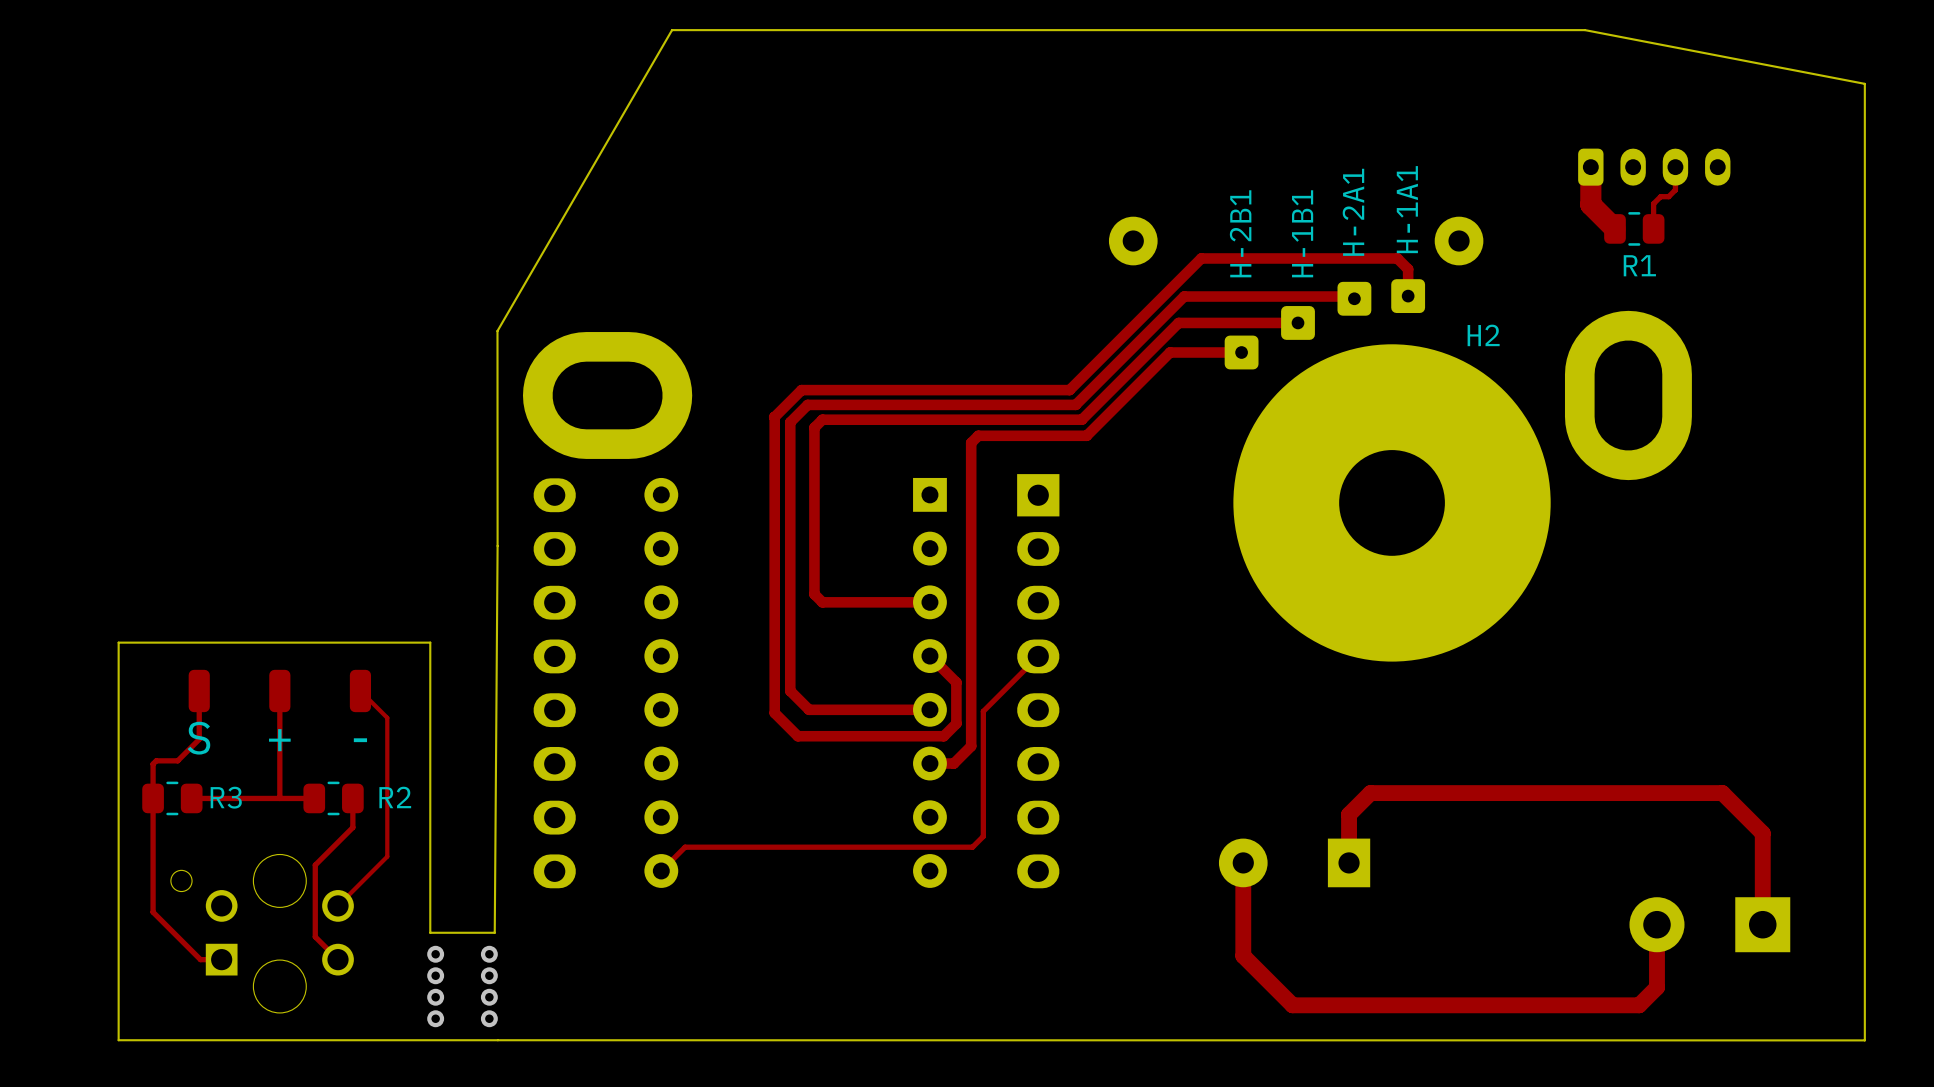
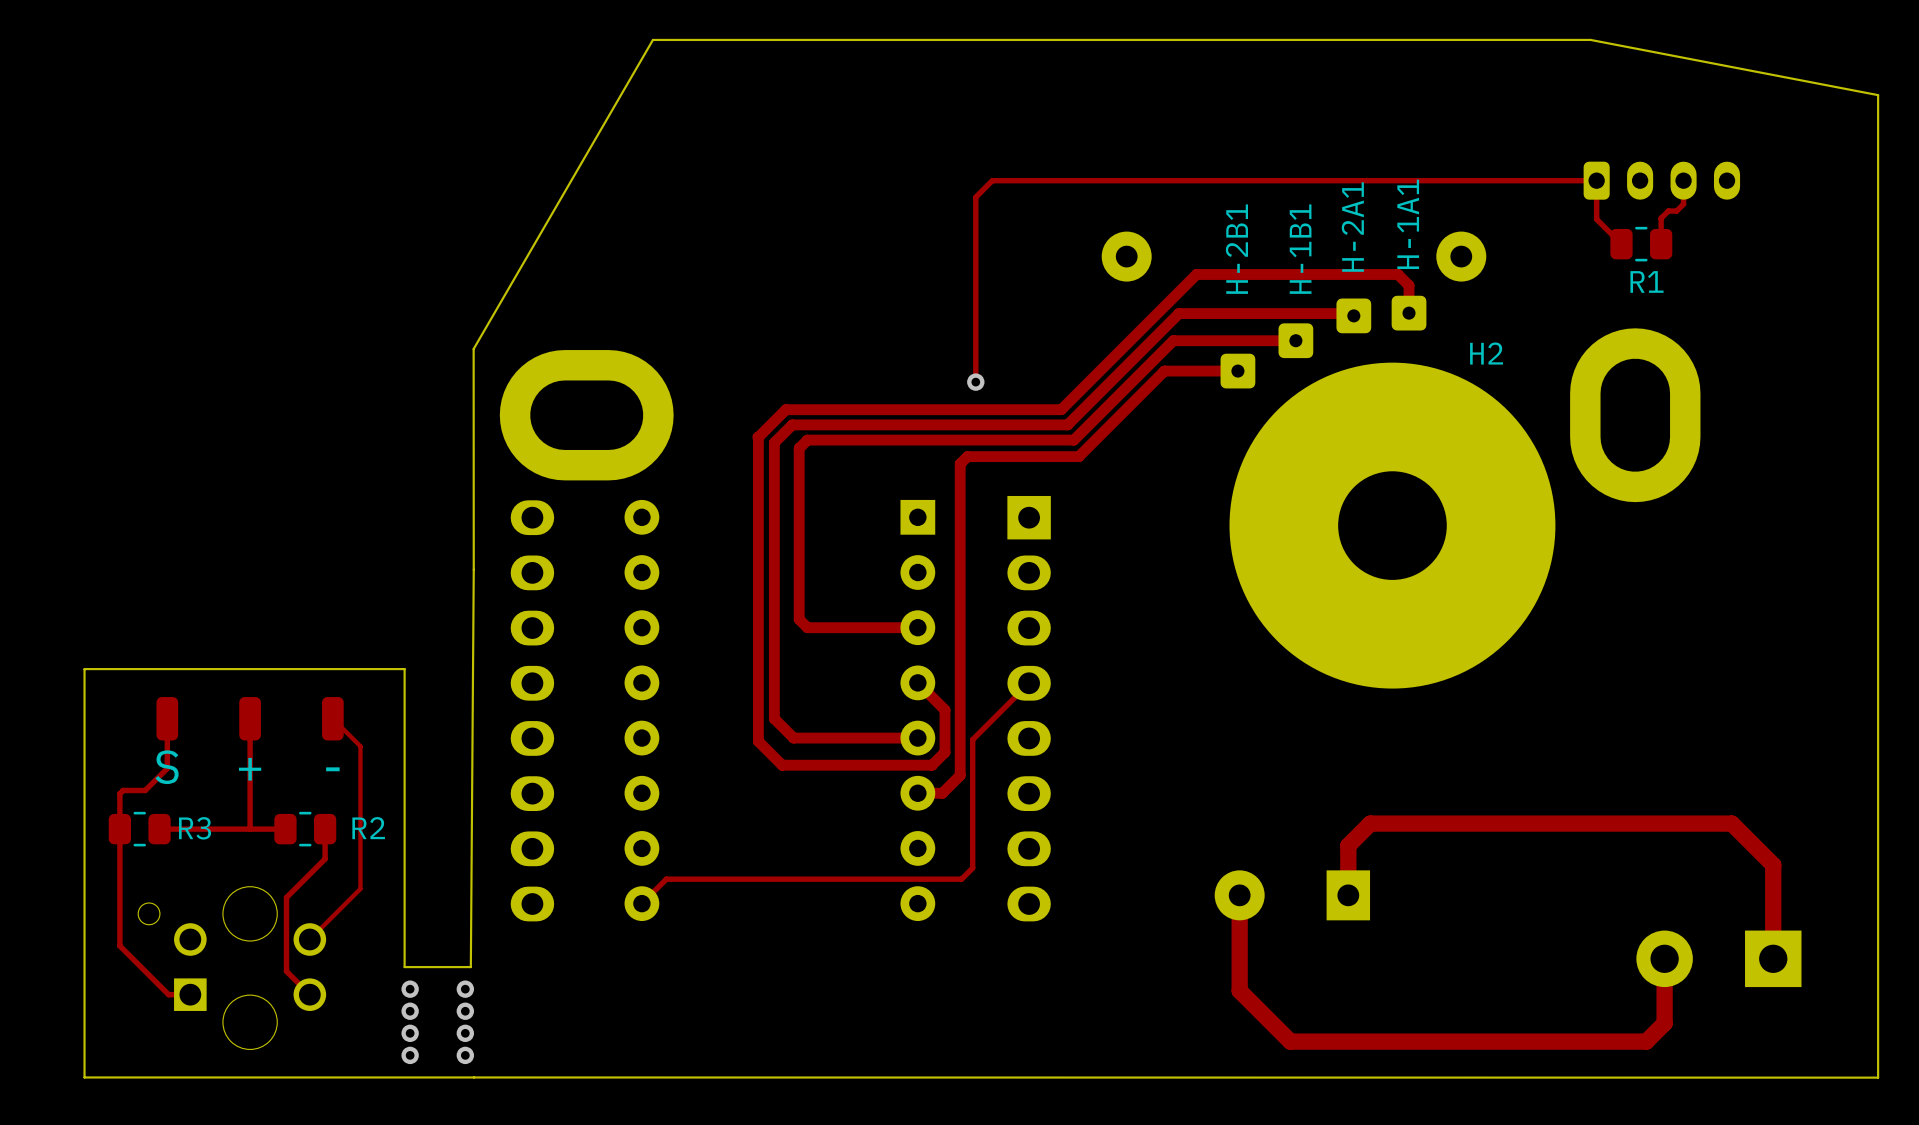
track: none -> (1596, 180) (992, 180) (975, 197) (975, 382)
track width: thick (1590, 167) (1590, 204) (1615, 228) -> thin (1596, 180) (1596, 219) (1621, 244)
via: none -> (975, 382)

